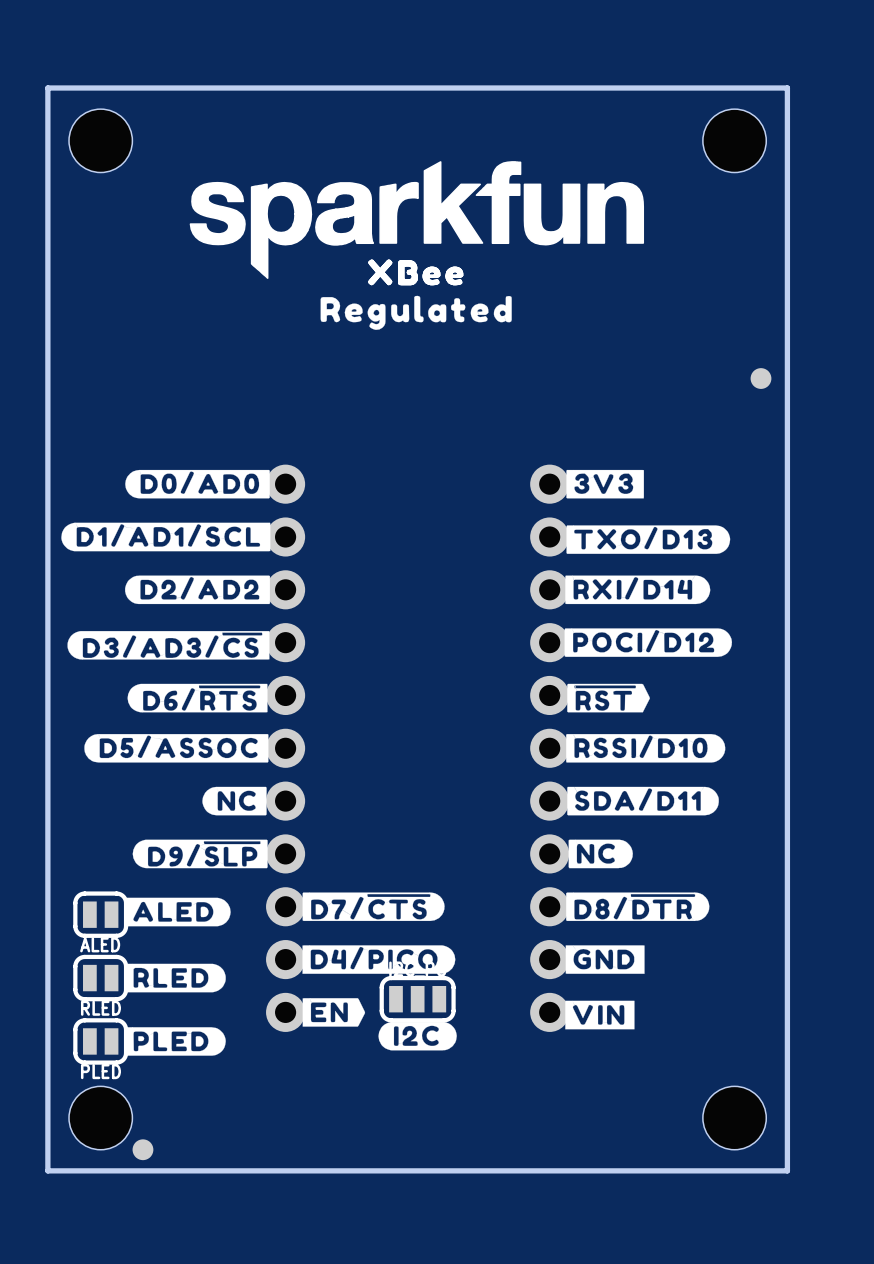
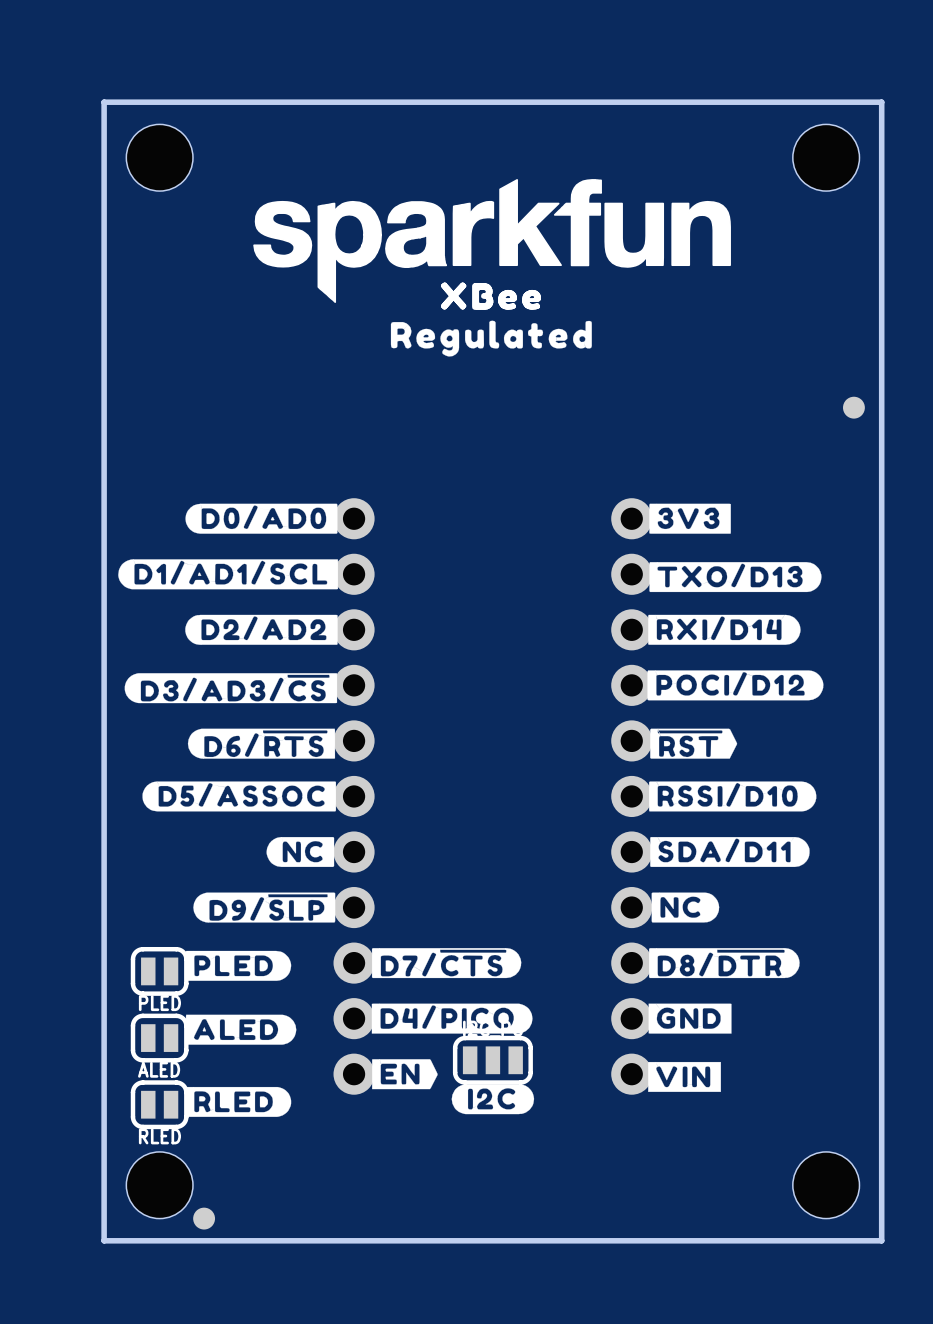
drawing position: (178, 912) -> (241, 1029)
ALED name: ALED (100, 944) -> PLED (159, 1003)
drawing position: (175, 978) -> (238, 1101)
RLED name: RLED (100, 1008) -> ALED (159, 1069)
drawing position: (175, 1041) -> (238, 965)
PLED name: PLED (100, 1071) -> RLED (159, 1136)

